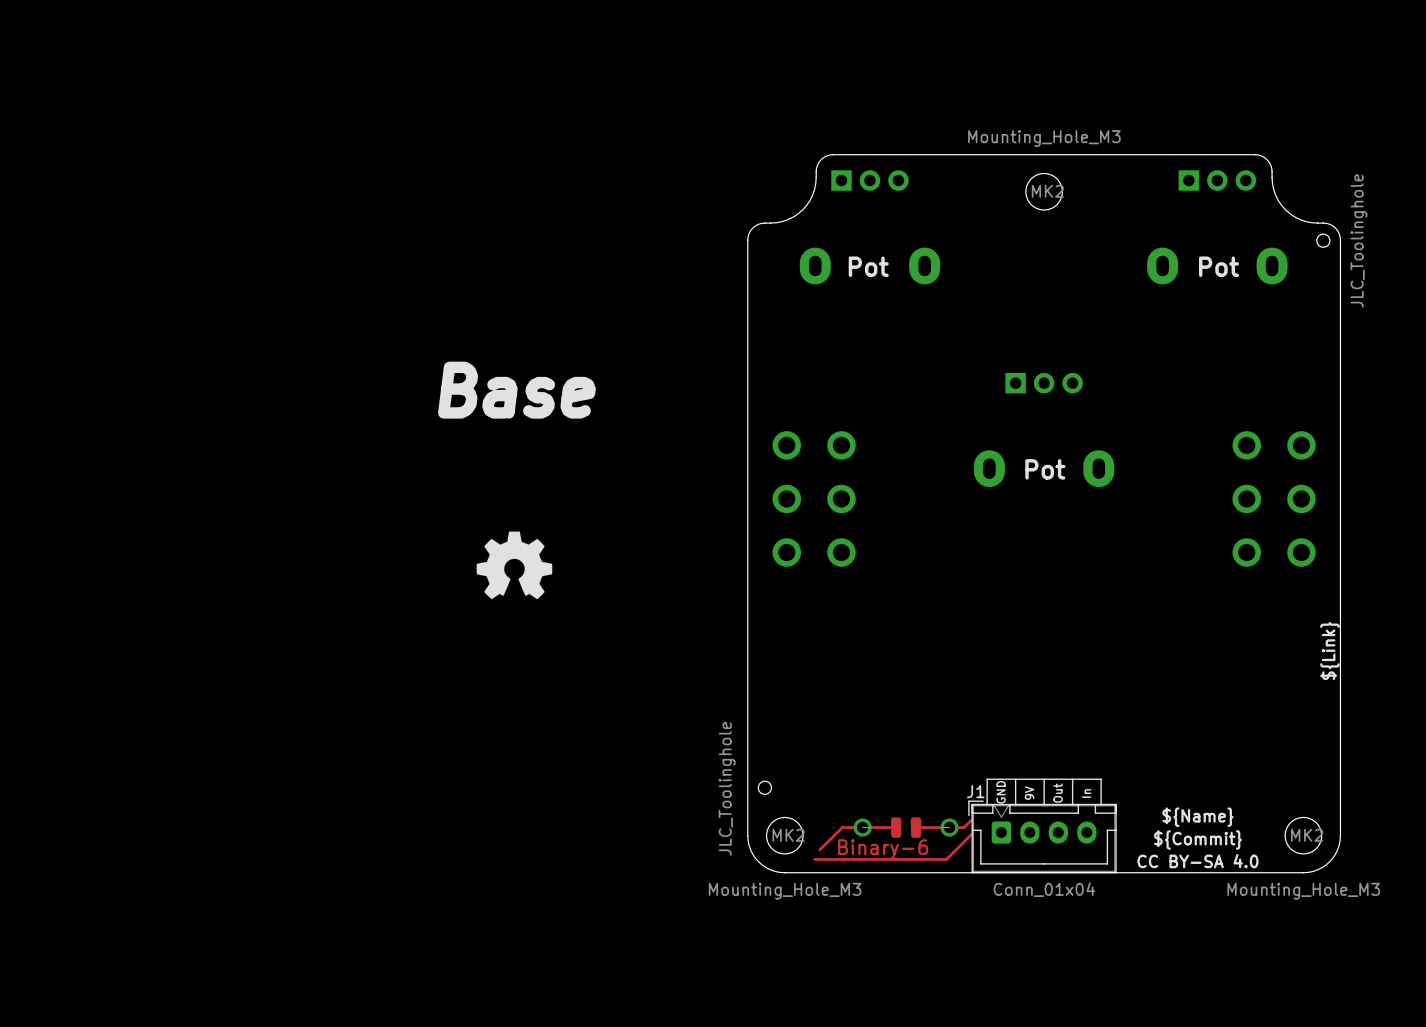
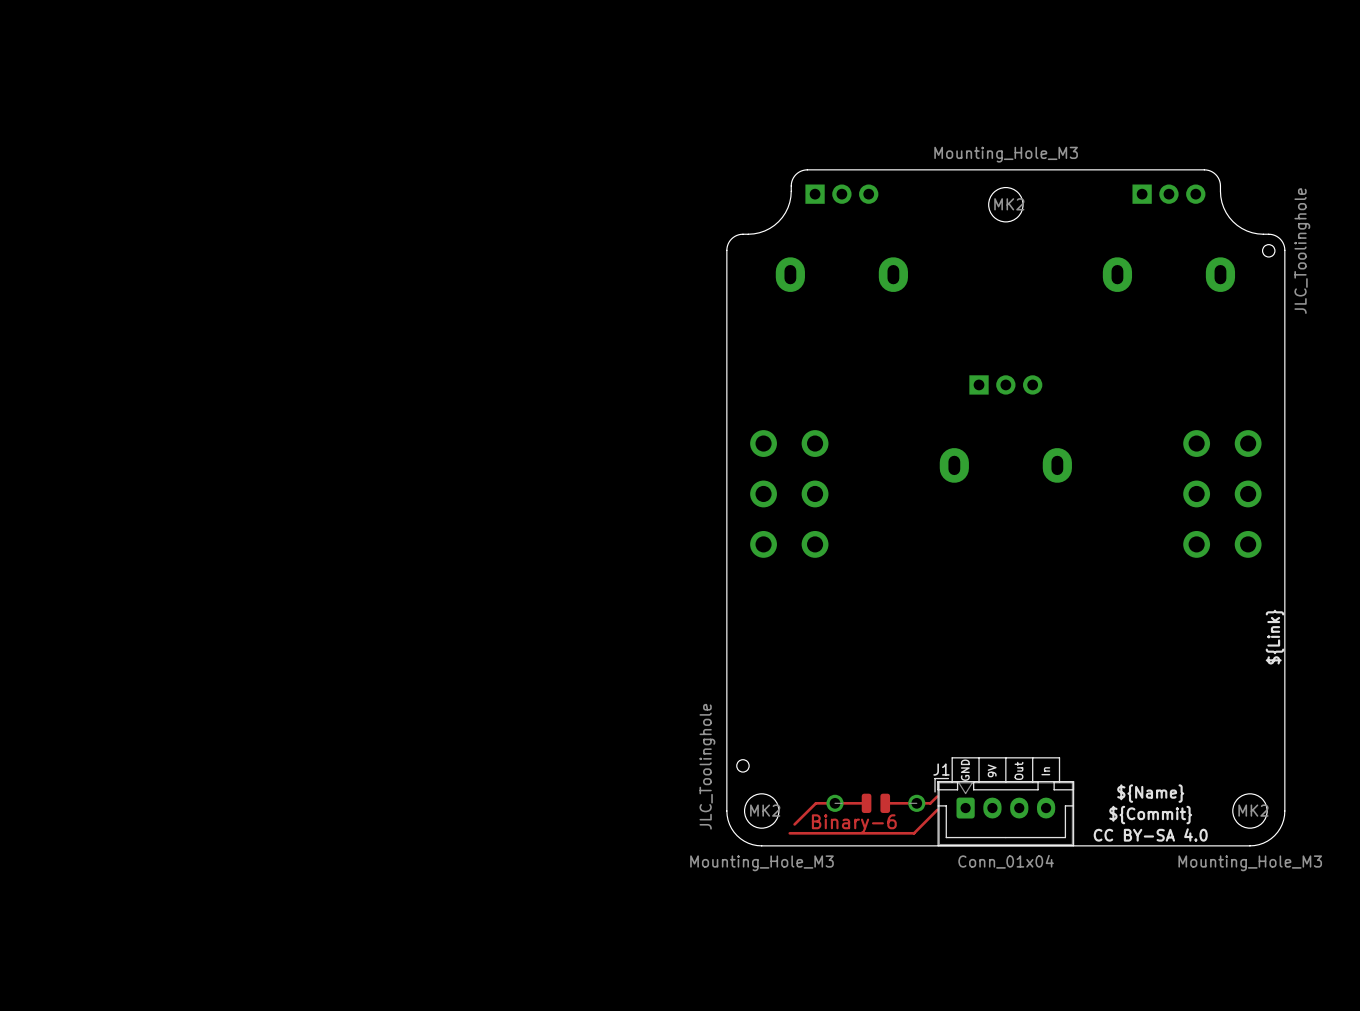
text: Pot (868, 266) -> none
text: Pot (1219, 266) -> none
text: Base (516, 390) -> none
text: Pot (1045, 469) -> none
drawing: [476, 531, 553, 600] -> none

